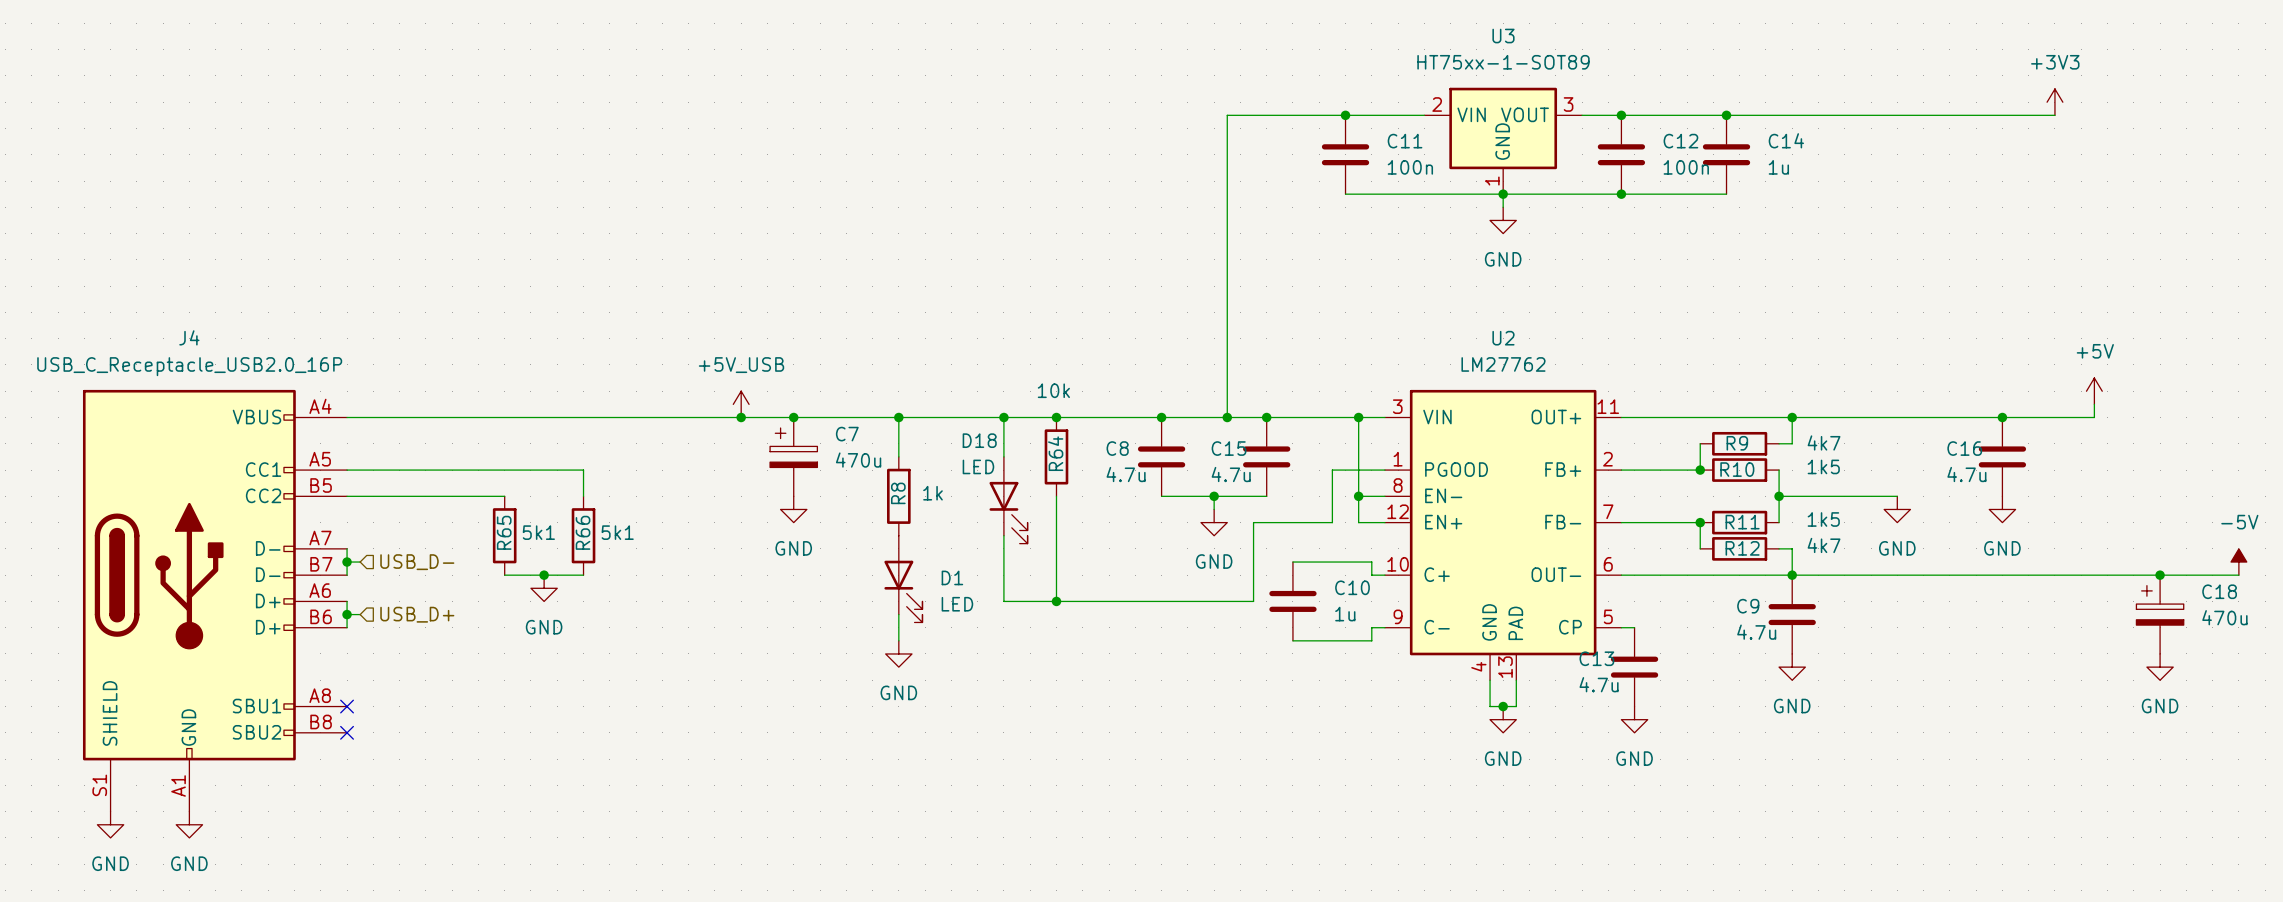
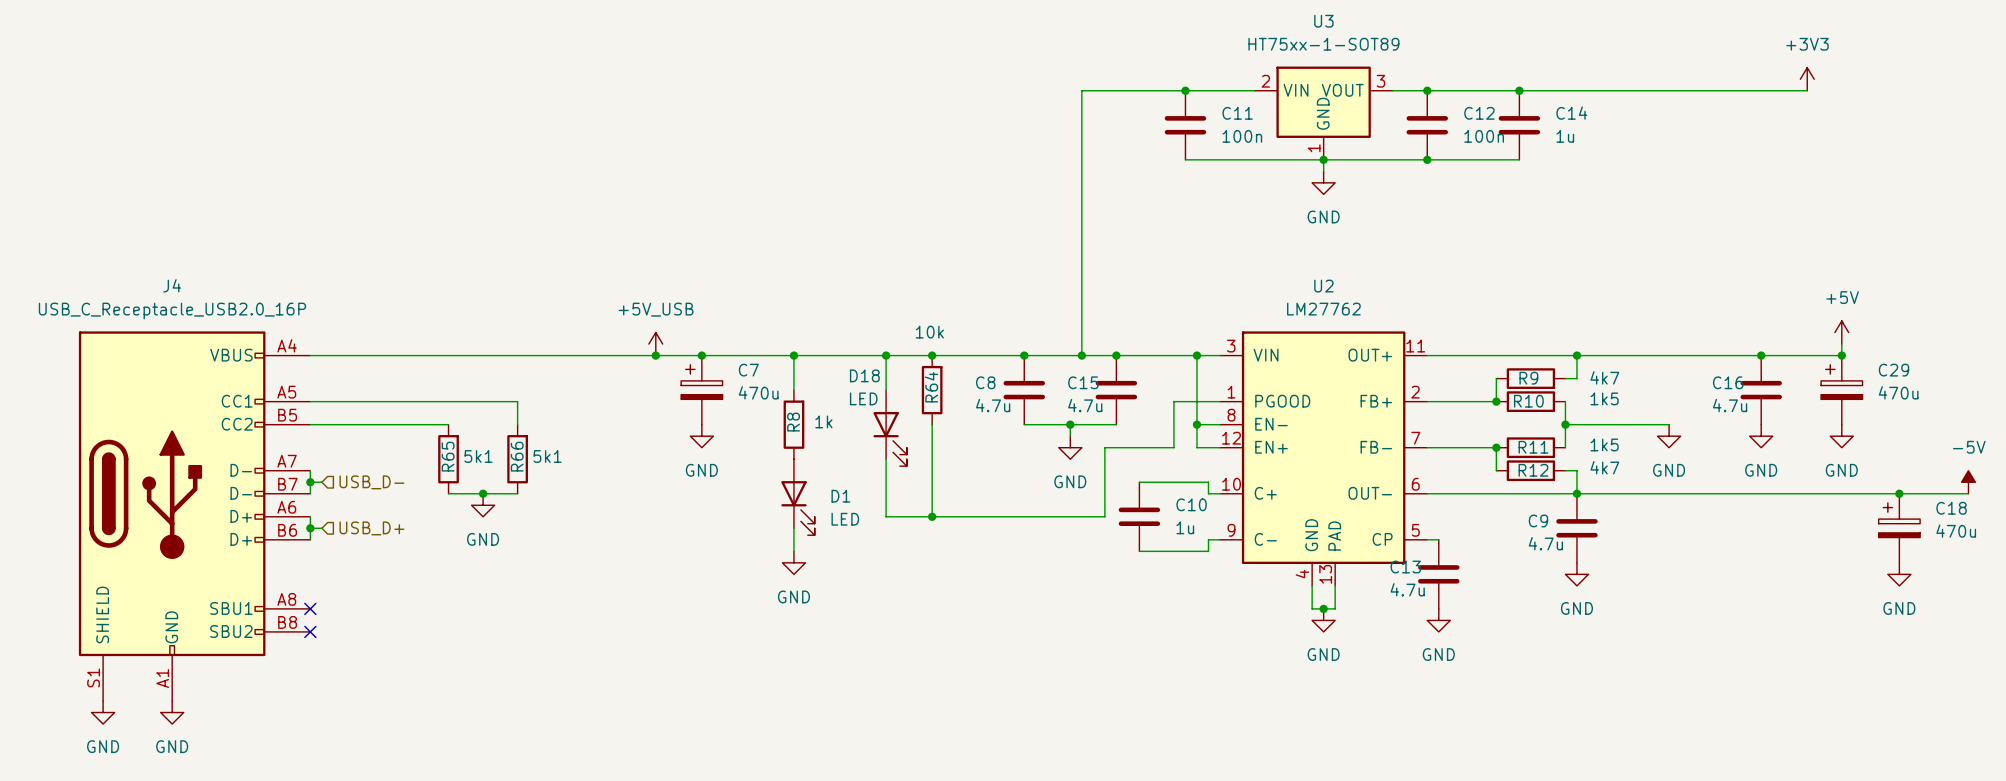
junction: none -> (1841, 355)
C29: none -> 470u (1841, 390)
power symbol: none -> GND (1841, 436)

